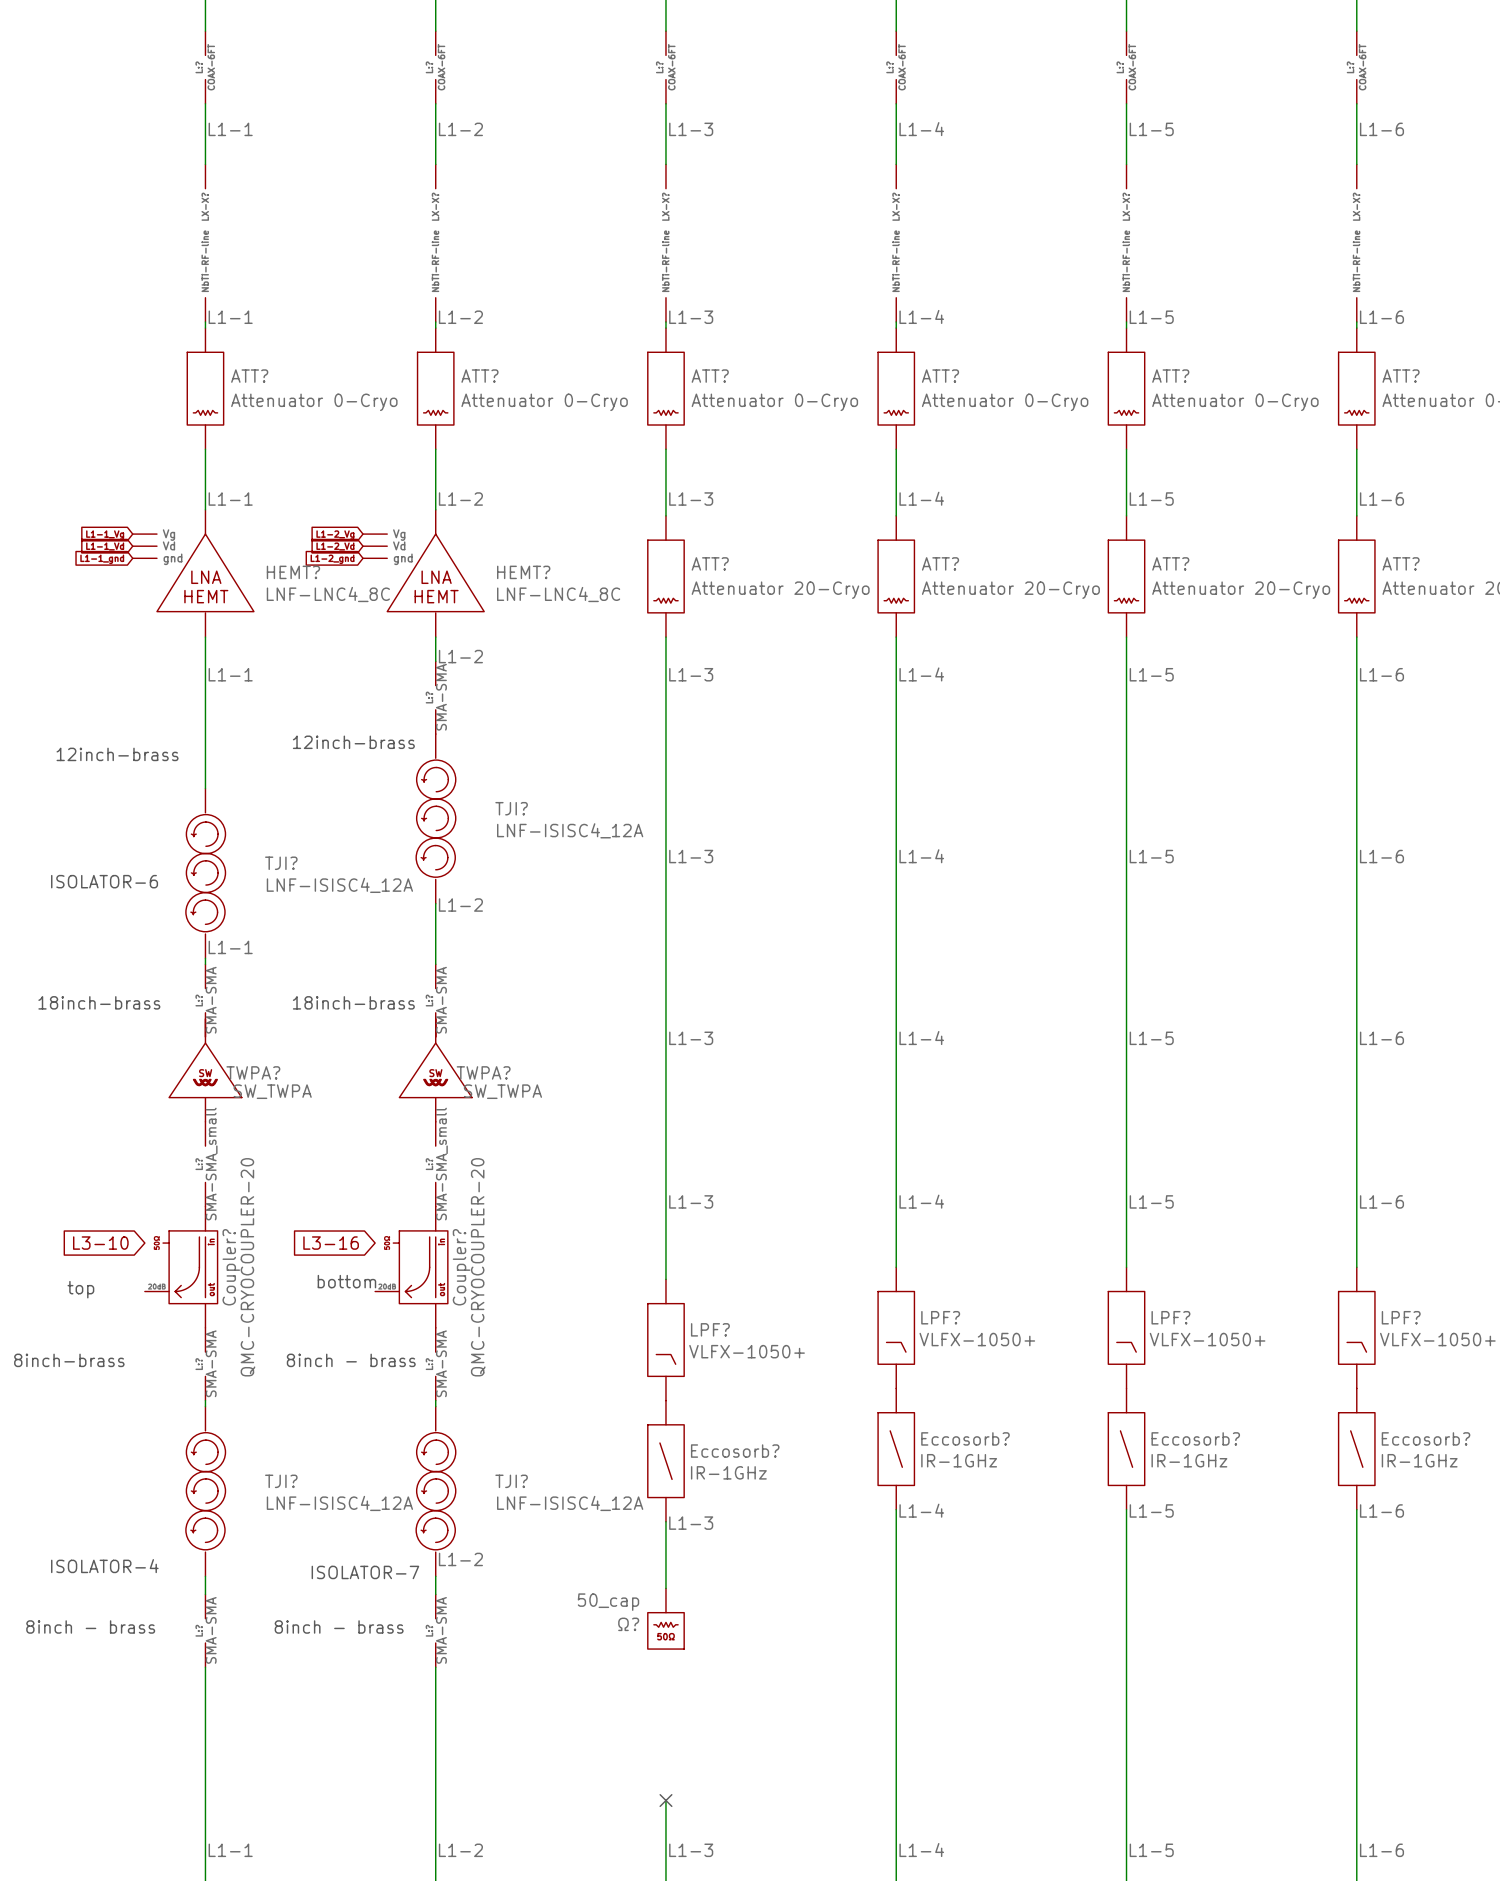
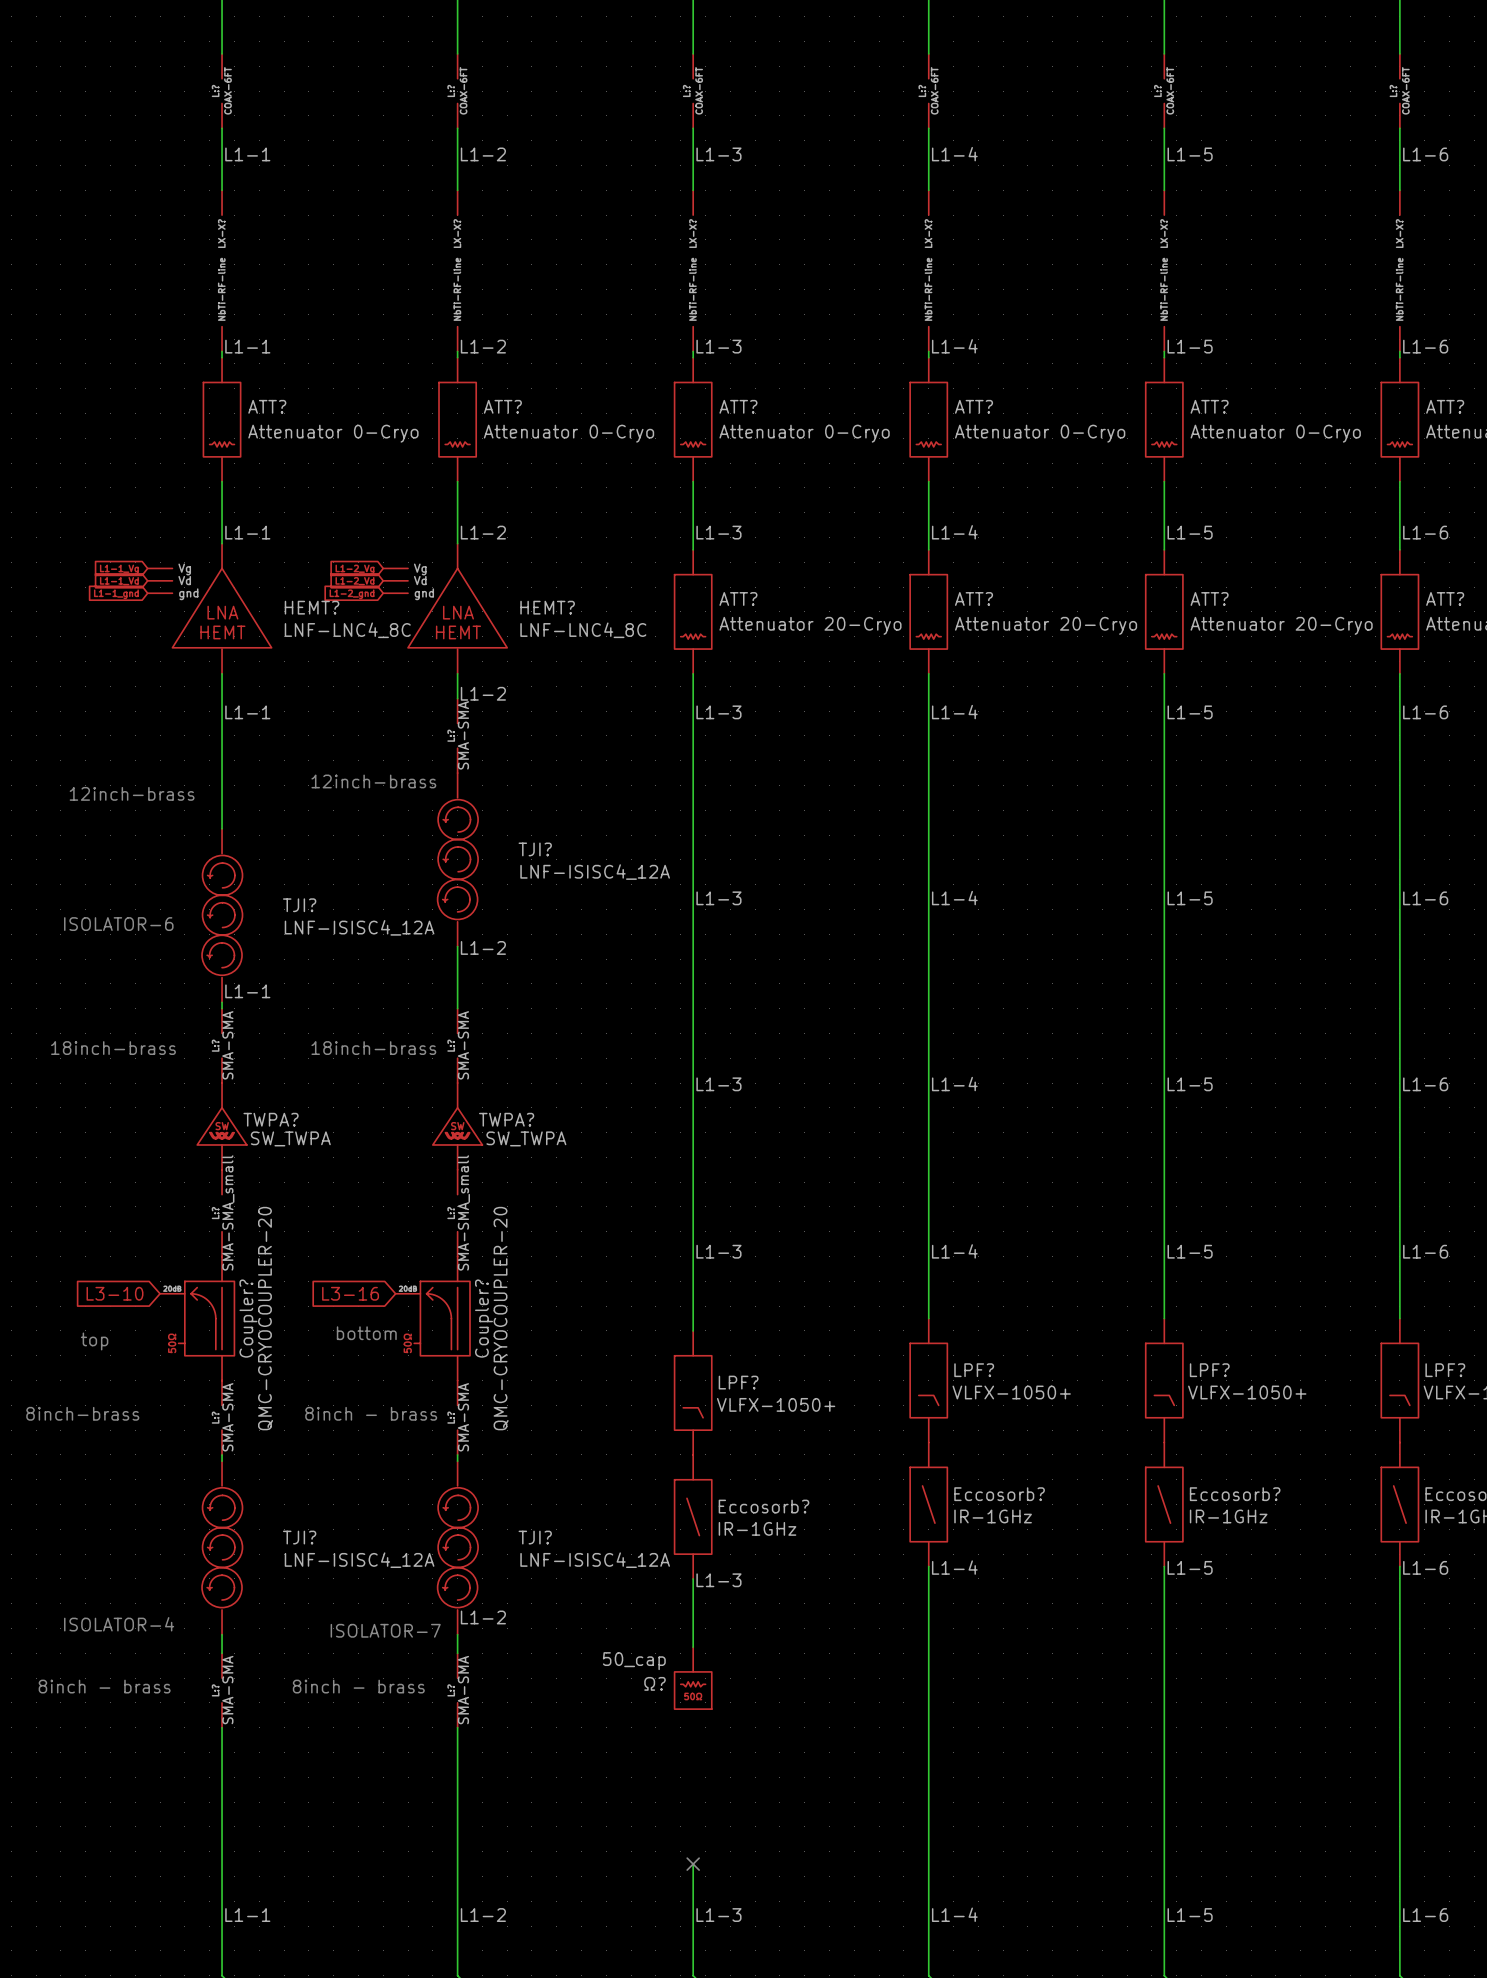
TWPA? symbol: [169, 1018, 242, 1122] -> [197, 1083, 247, 1170]
TWPA? symbol: [399, 1018, 473, 1122] -> [432, 1083, 483, 1170]
Coupler? symbol: [144, 1206, 218, 1328] -> [160, 1256, 235, 1381]
Coupler? symbol: [375, 1206, 448, 1328] -> [395, 1256, 471, 1381]

